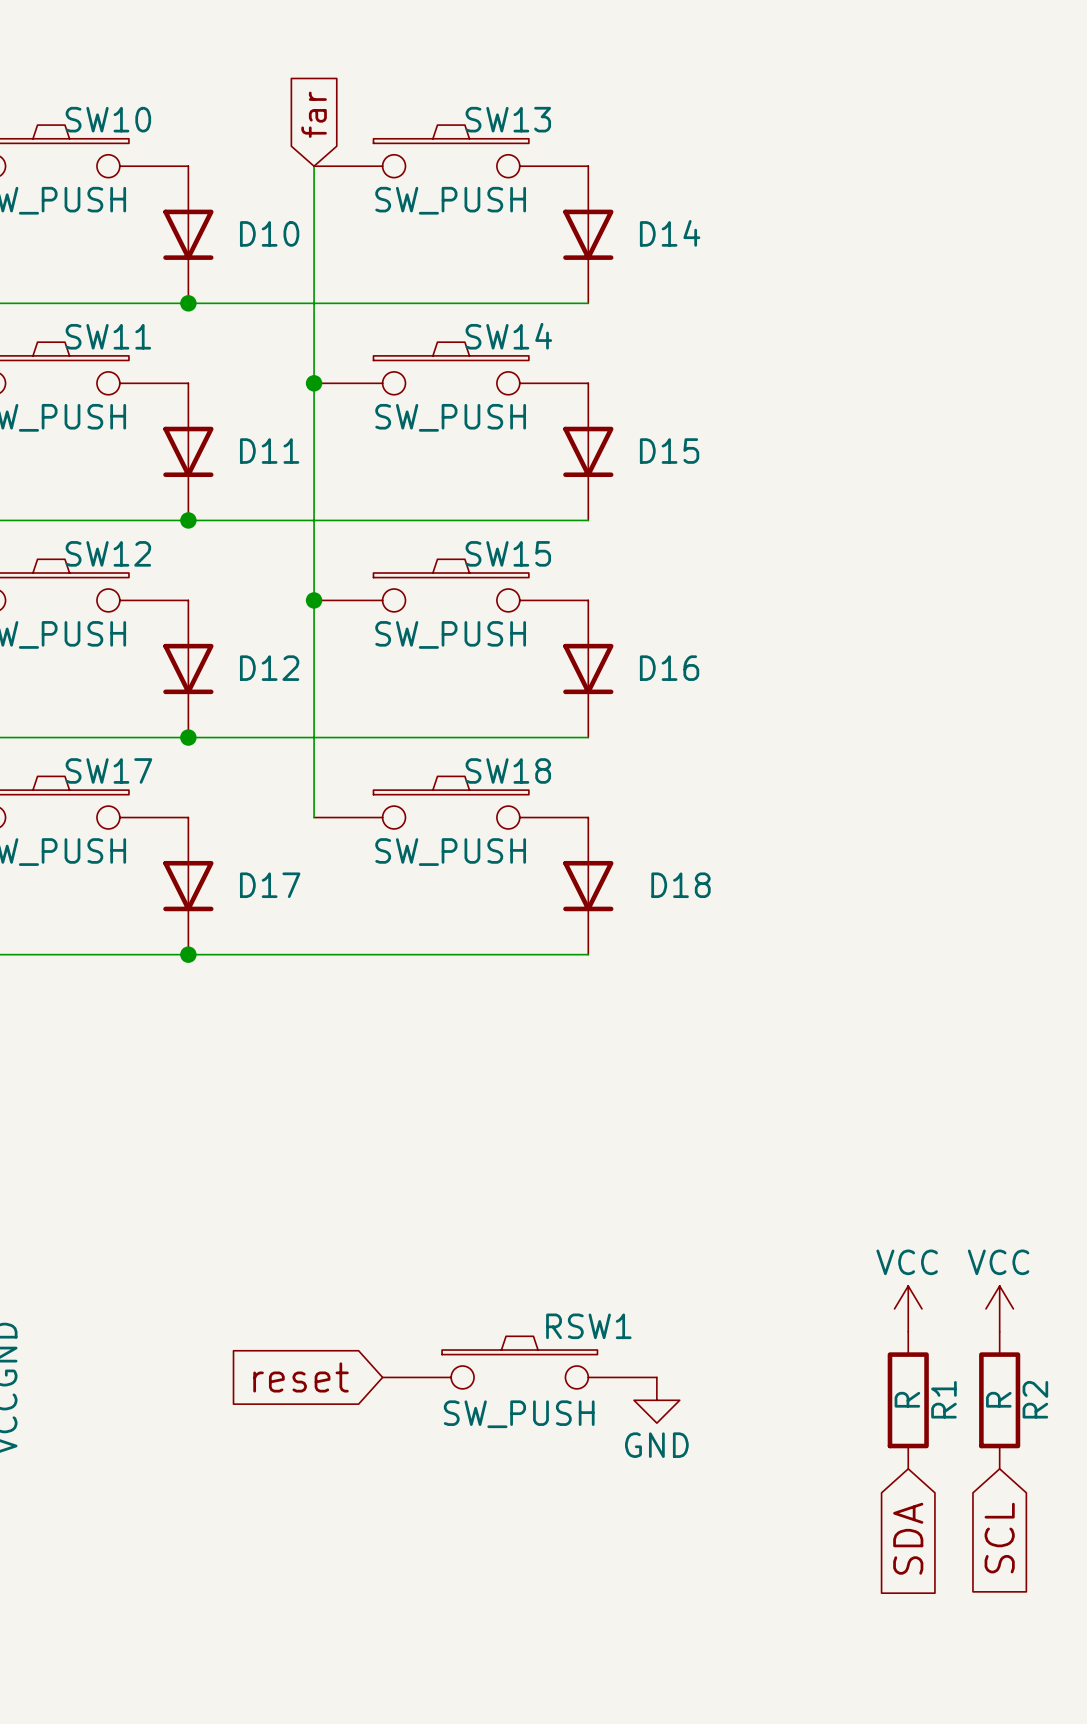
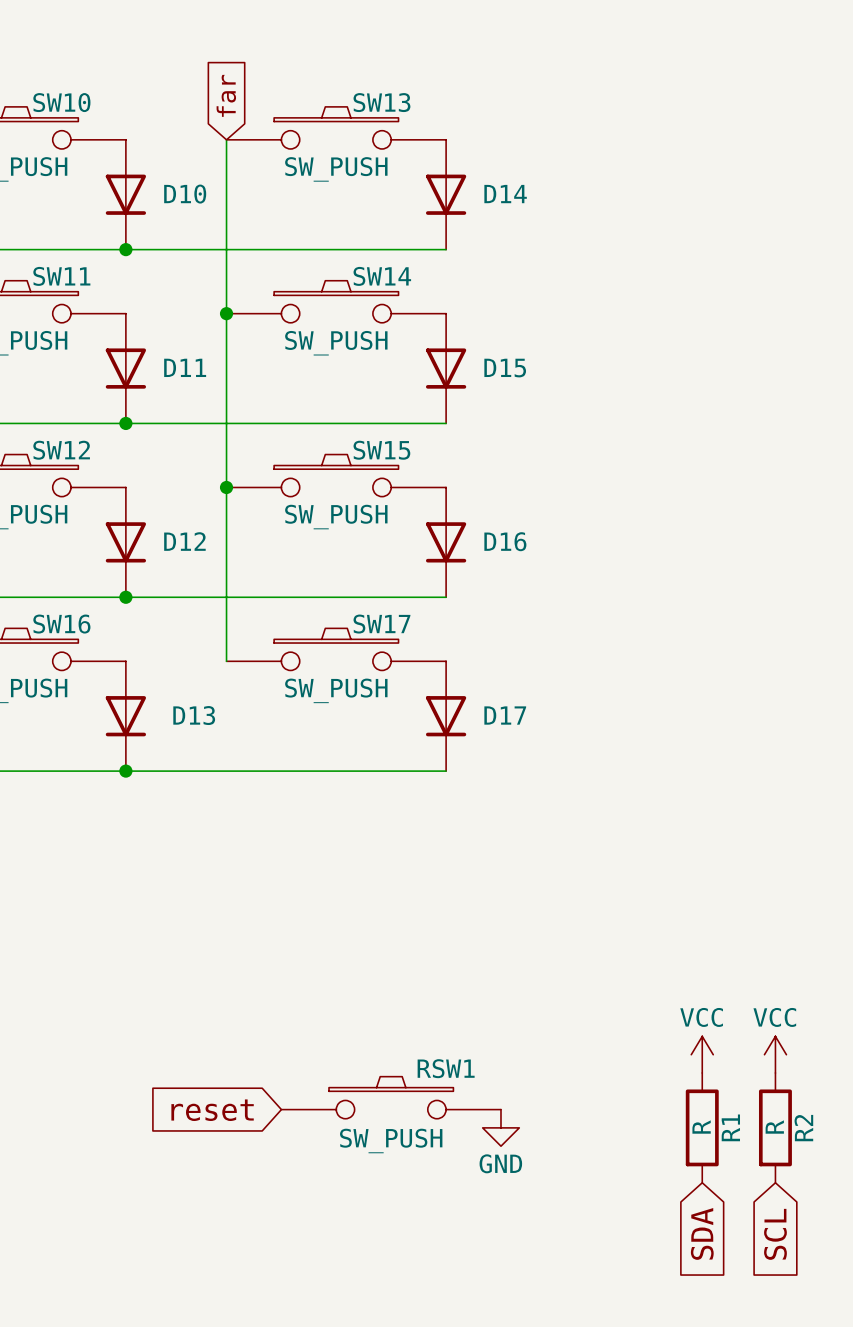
SW17 name: SW17 (108, 770) -> SW16 (61, 624)
SW18 name: SW18 (508, 770) -> SW17 (381, 624)
D17 name: D17 (270, 885) -> D13 (194, 715)
D18 name: D18 (680, 885) -> D17 (505, 715)

